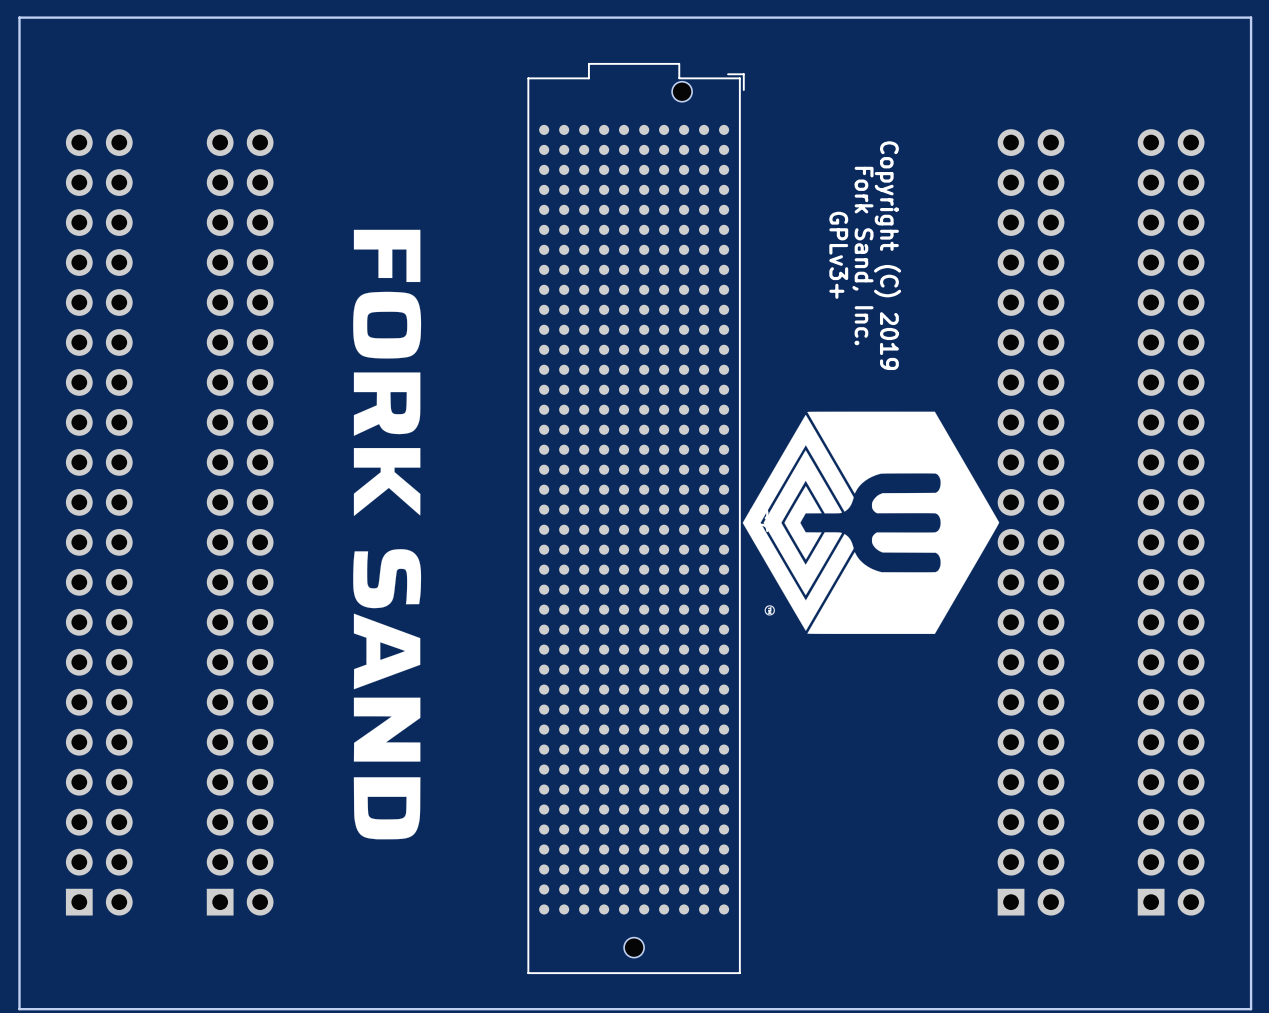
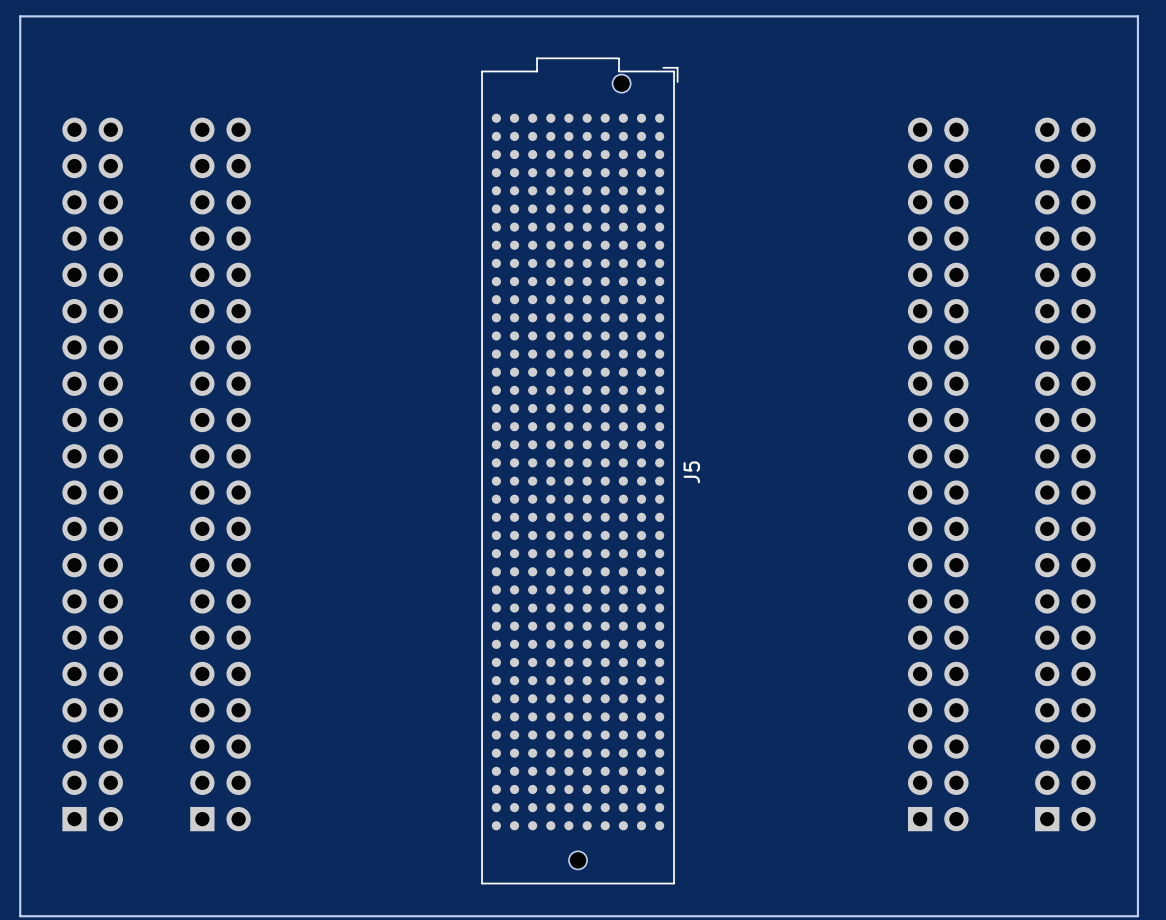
drawing: [353, 229, 422, 840] -> none
text: GPLv3+ (838, 255) -> none
text: Copyright (C) 2019 (887, 255) -> none
text: Fork Sand, Inc. (862, 256) -> none
drawing: [742, 411, 1000, 634] -> none

